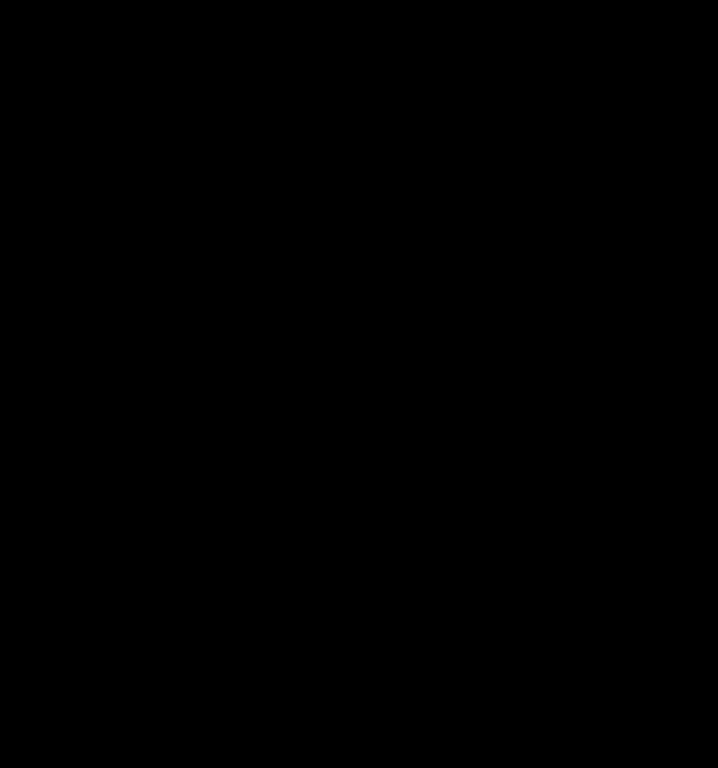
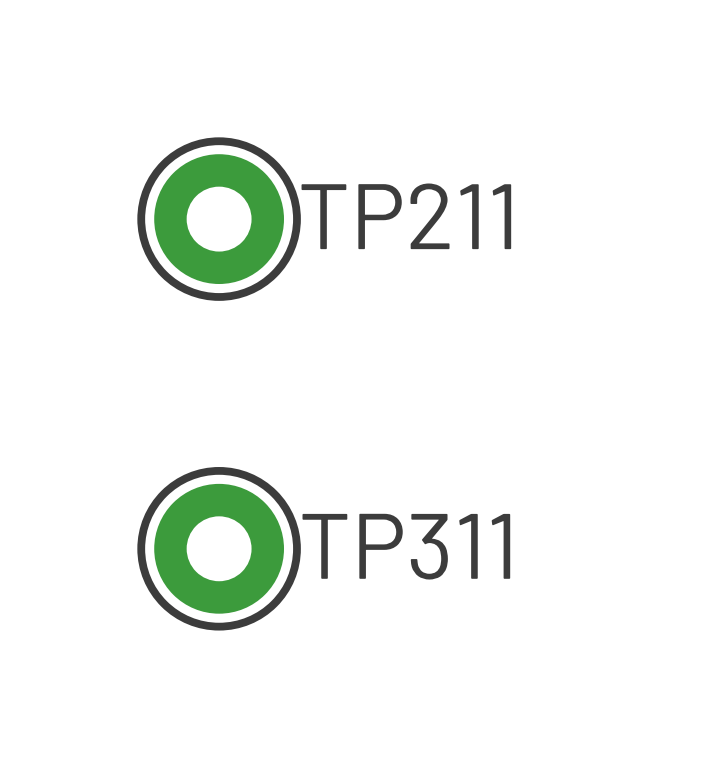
TP211: none -> (219, 219)
TP311: none -> (219, 548)

